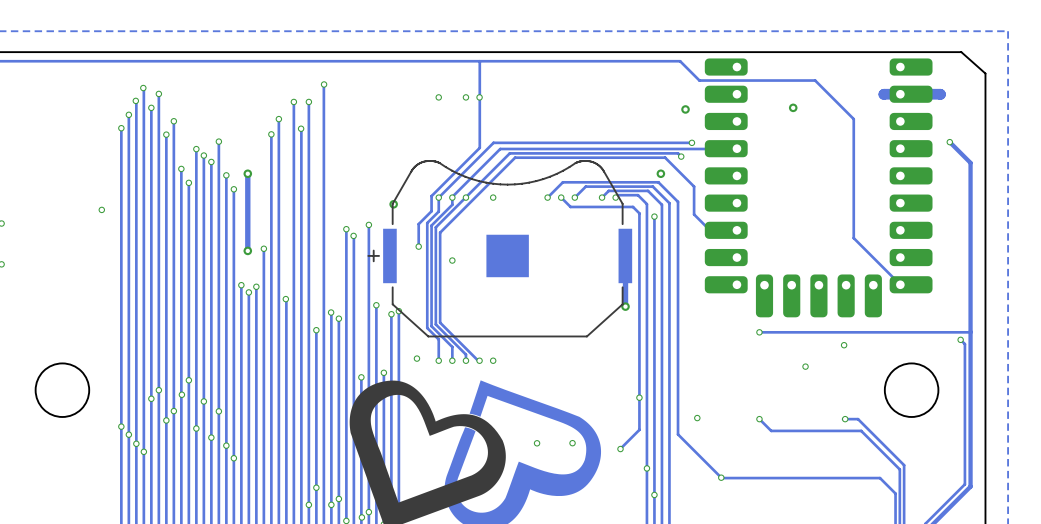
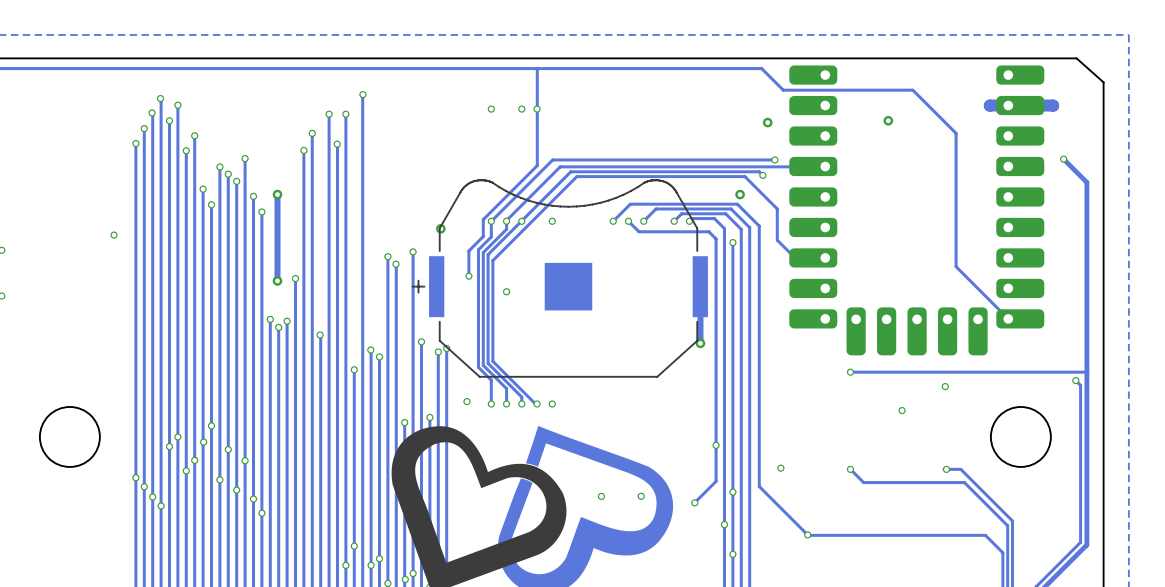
via: none -> (732, 492)

